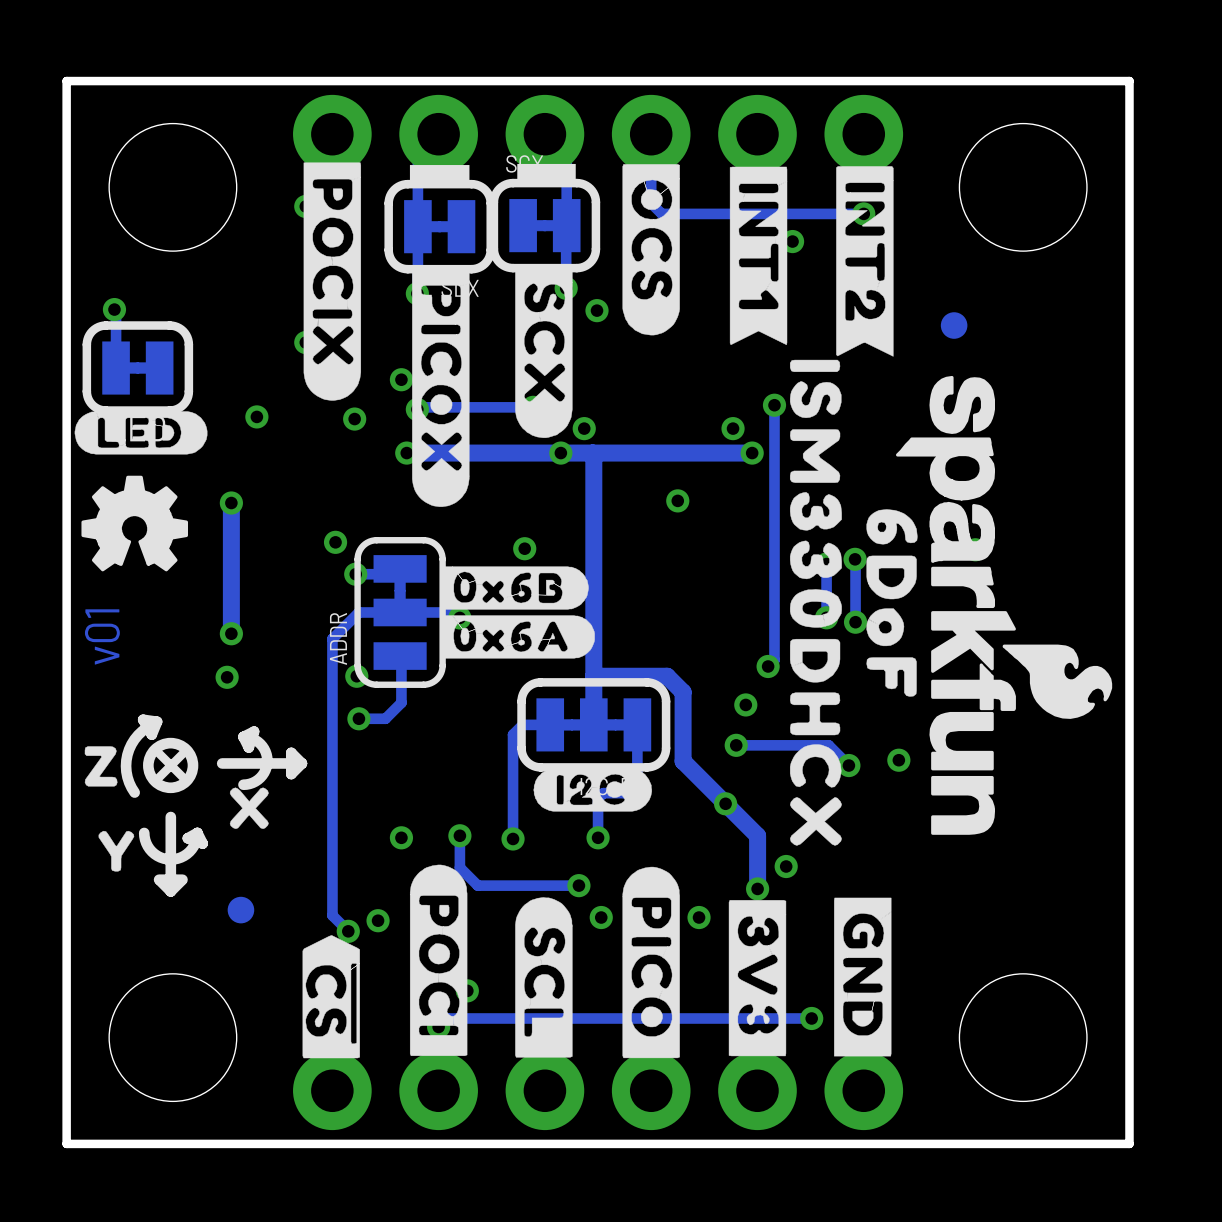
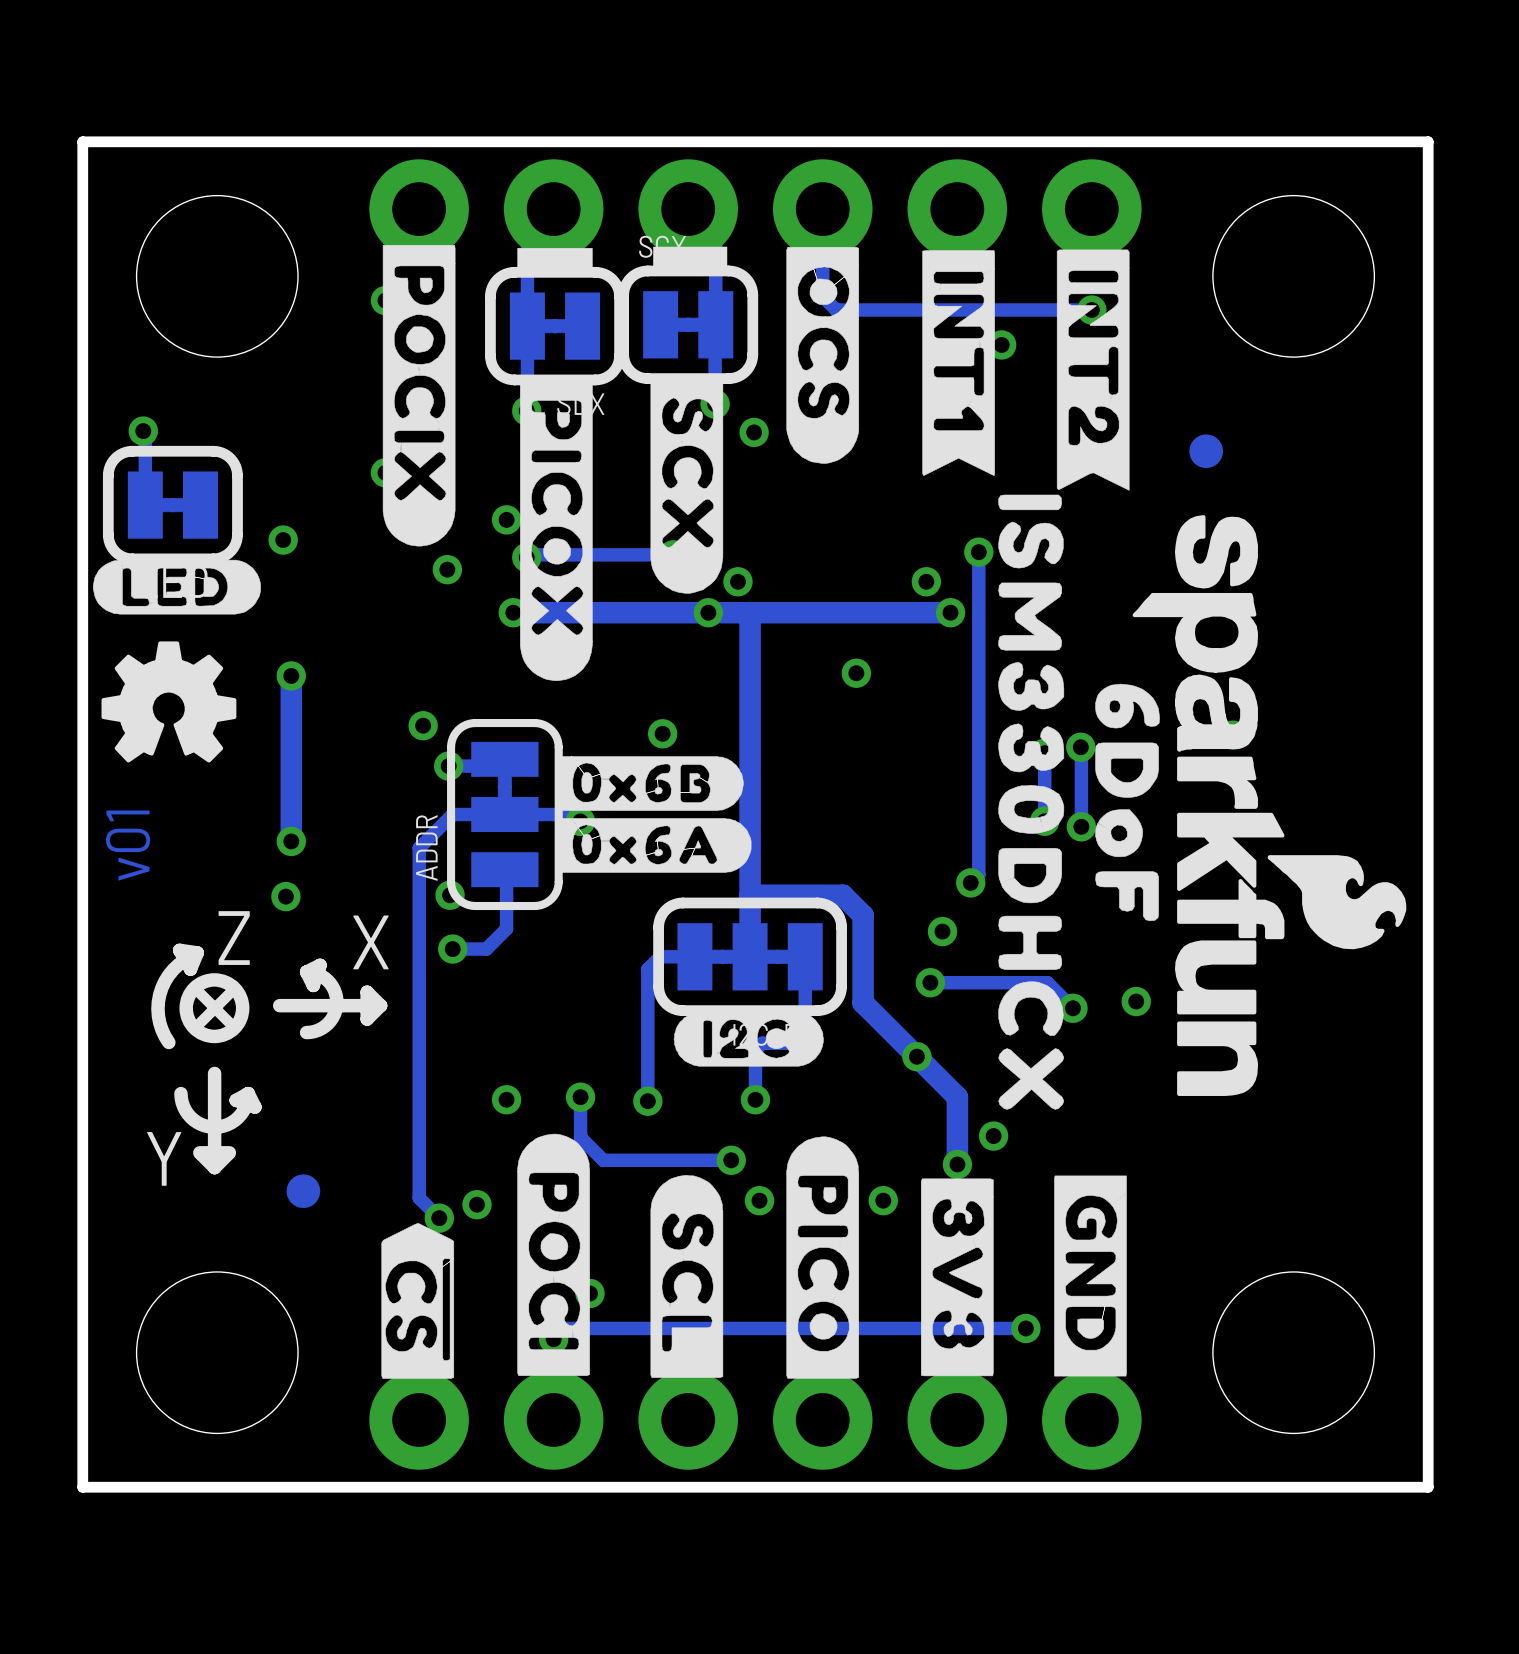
via position: (256, 416) -> (283, 540)
text: none -> Z (234, 938)
text: none -> X (370, 942)
drawing: [84, 746, 135, 872] -> none
drawing: [229, 787, 269, 829] -> none
text: none -> Y (164, 1158)

